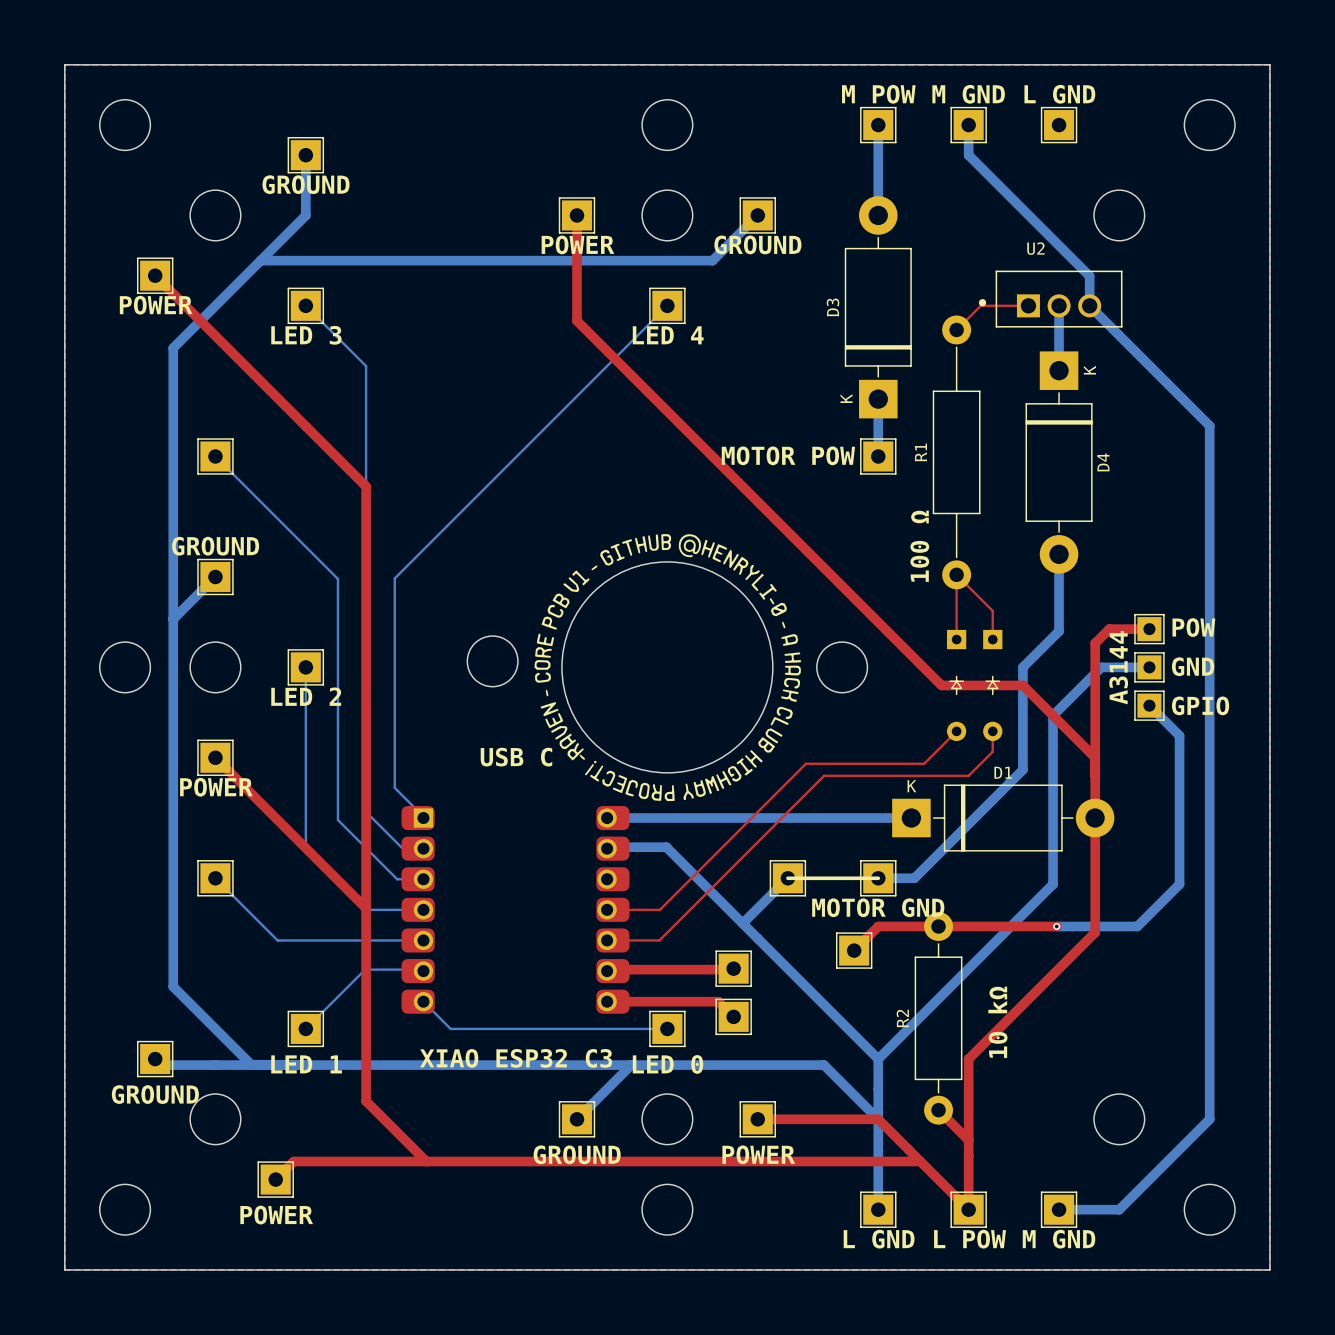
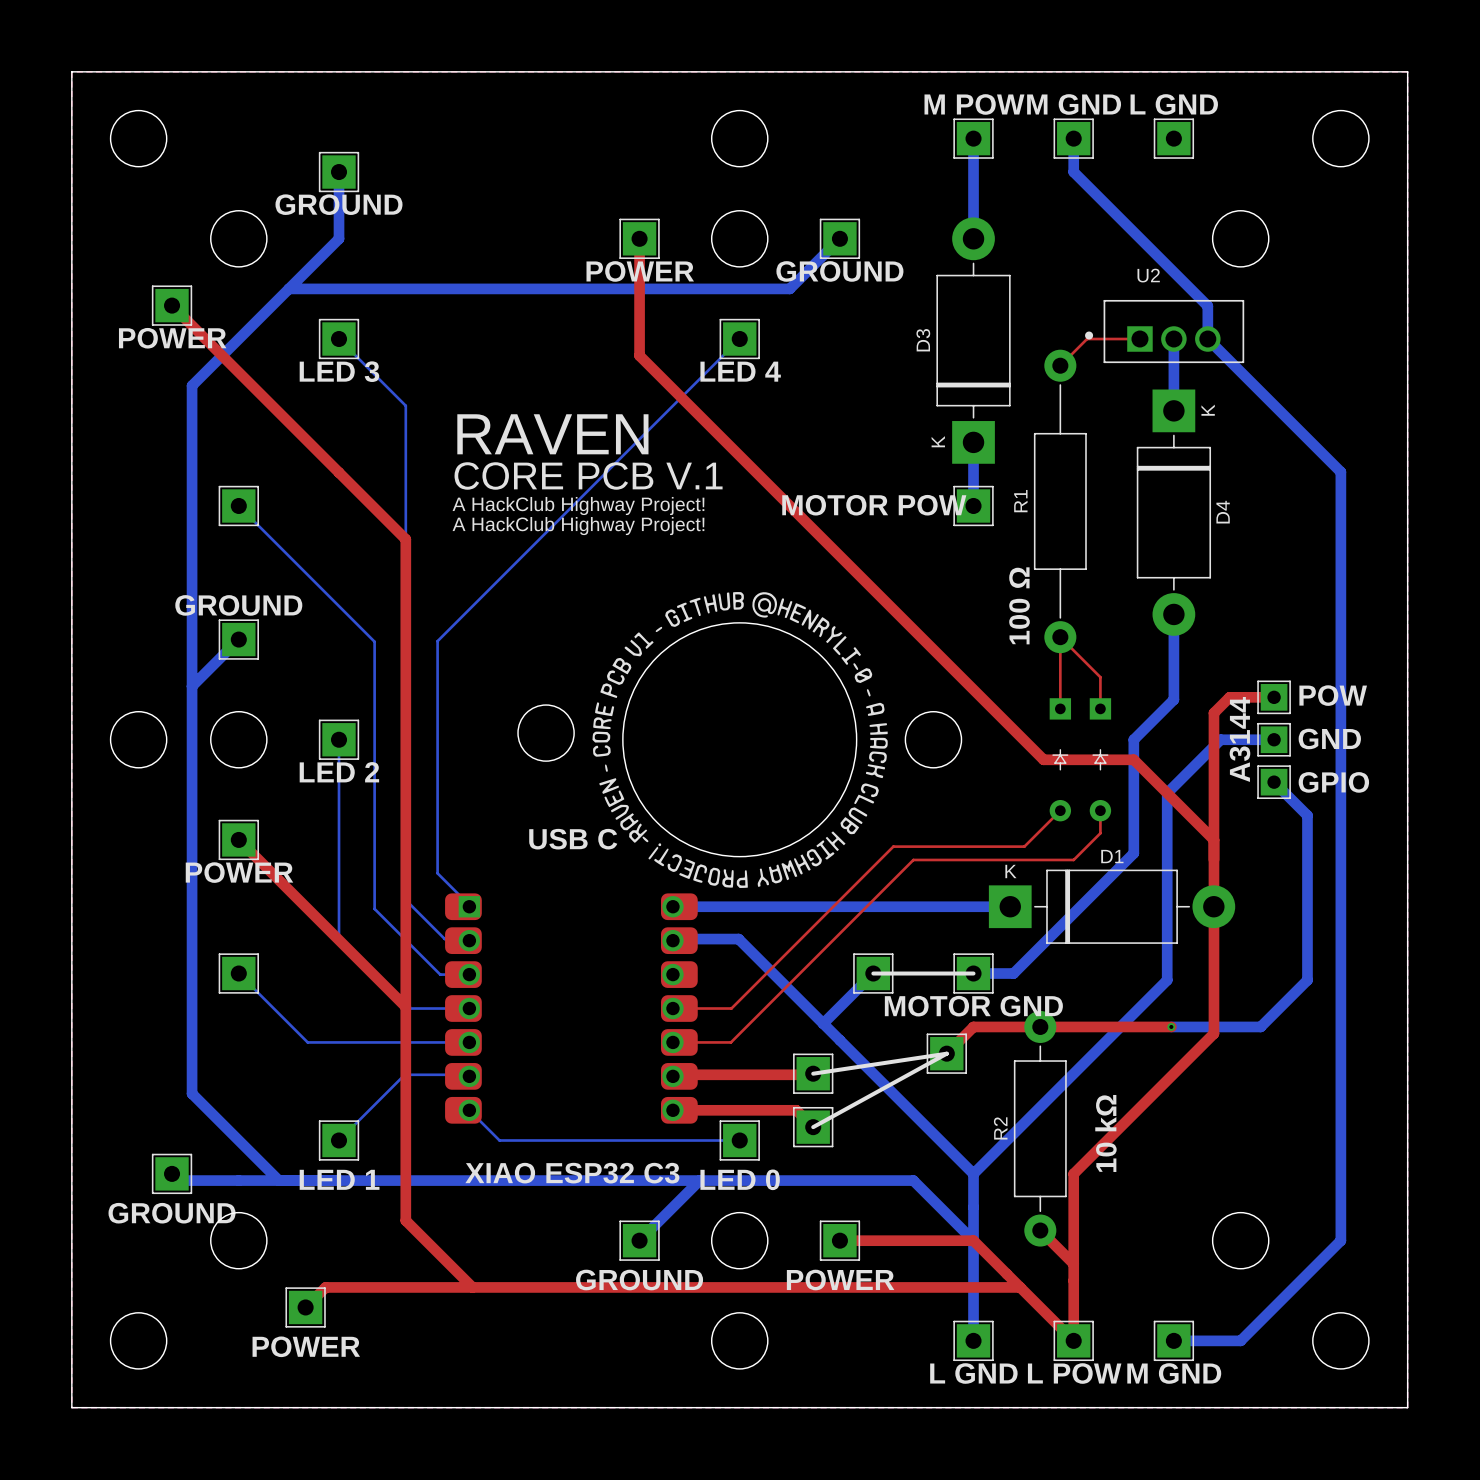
text: none -> RAVEN (552, 434)
text: none -> CORE PCB V.1 (588, 475)
text: none -> A HackClub Highway Project! (578, 506)
text: none -> A HackClub Highway Project! (578, 526)
line: none -> (813, 1073) (946, 1053) (813, 1127)

